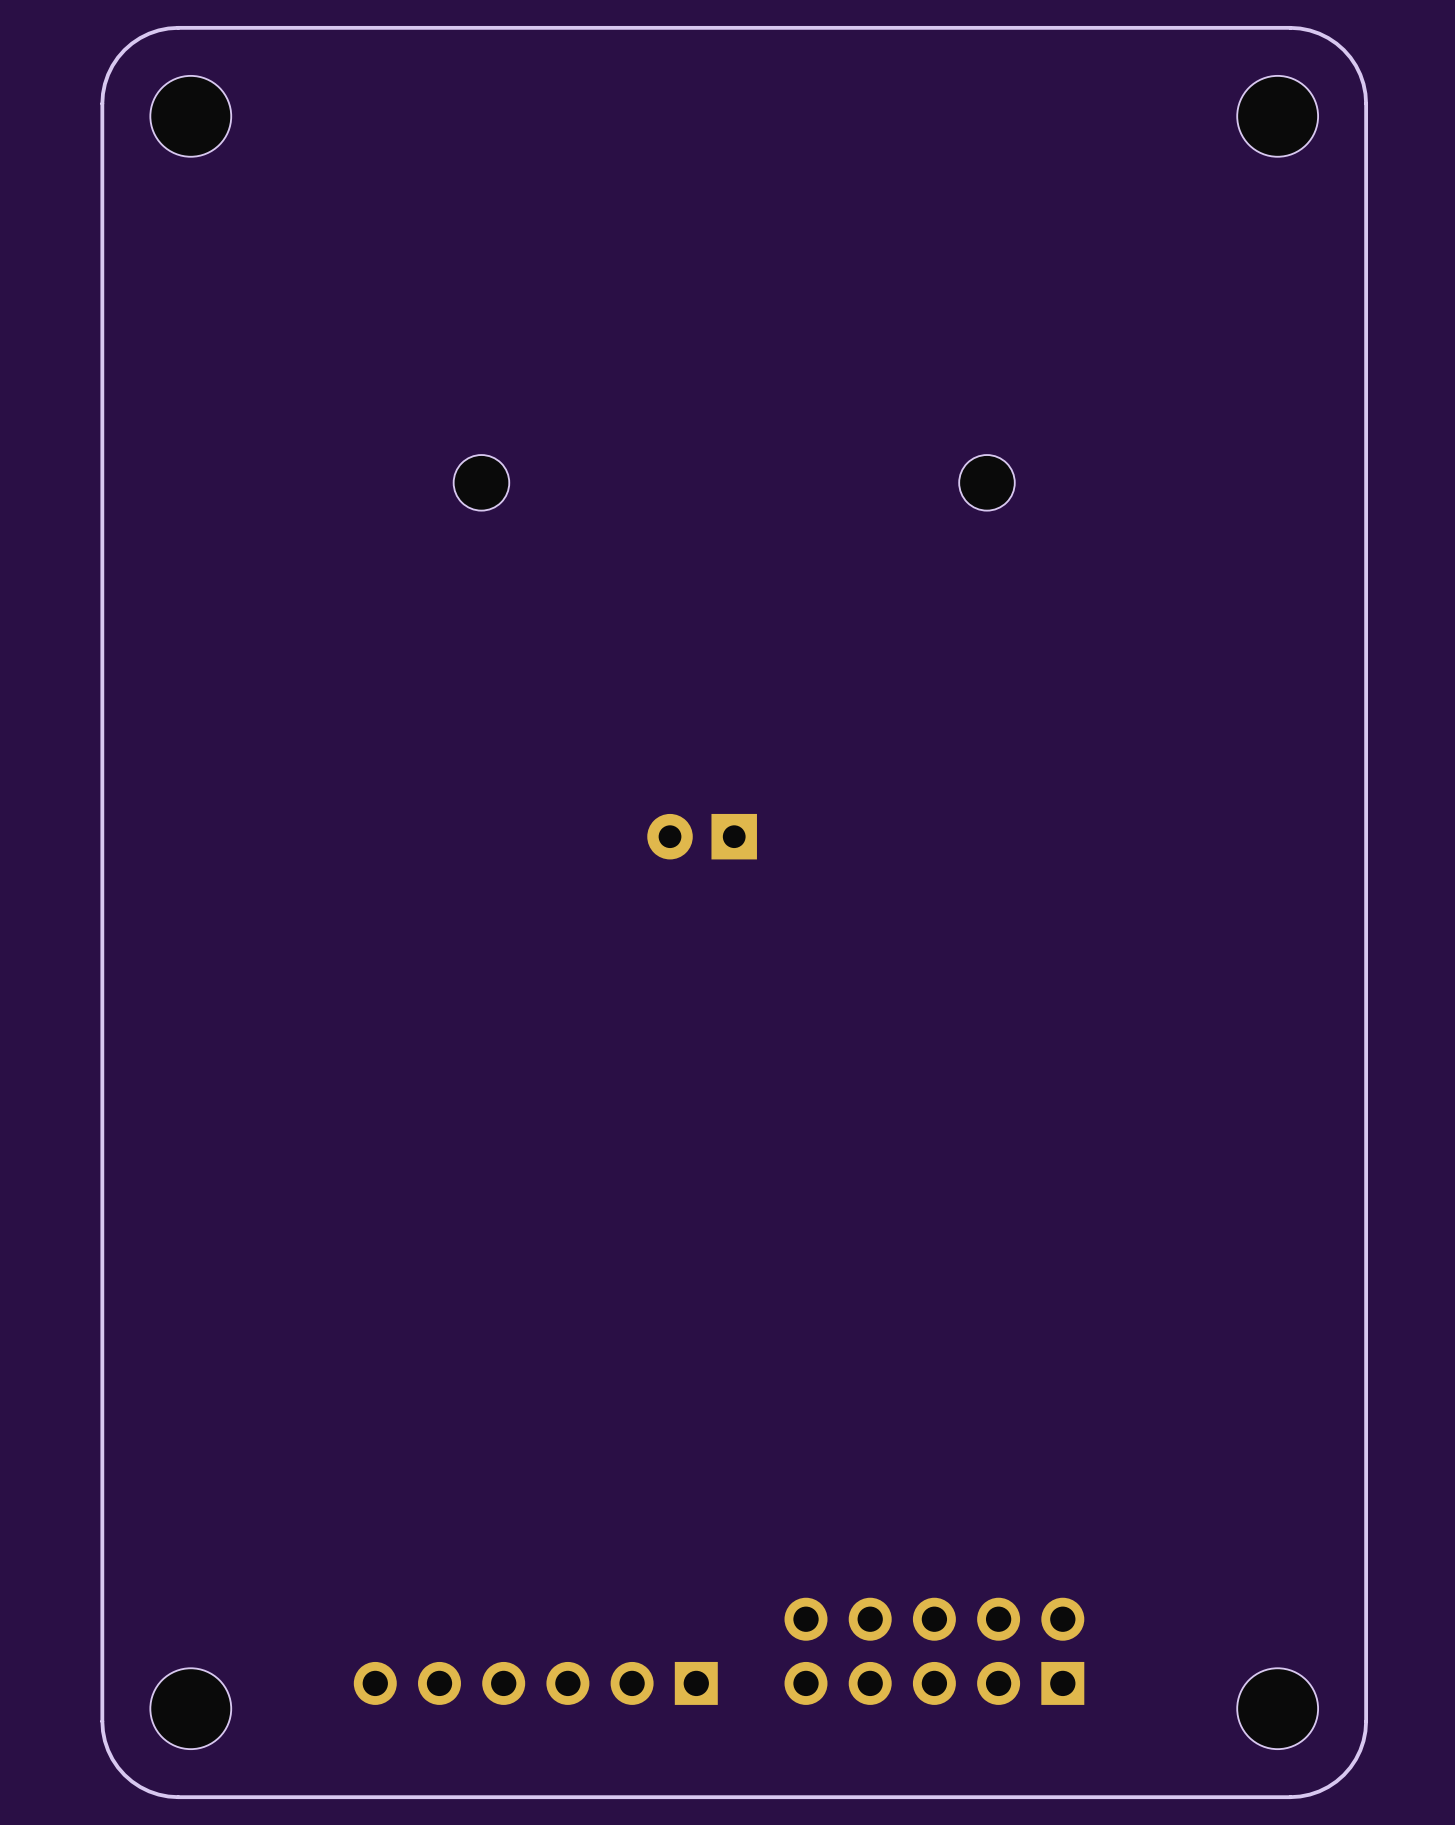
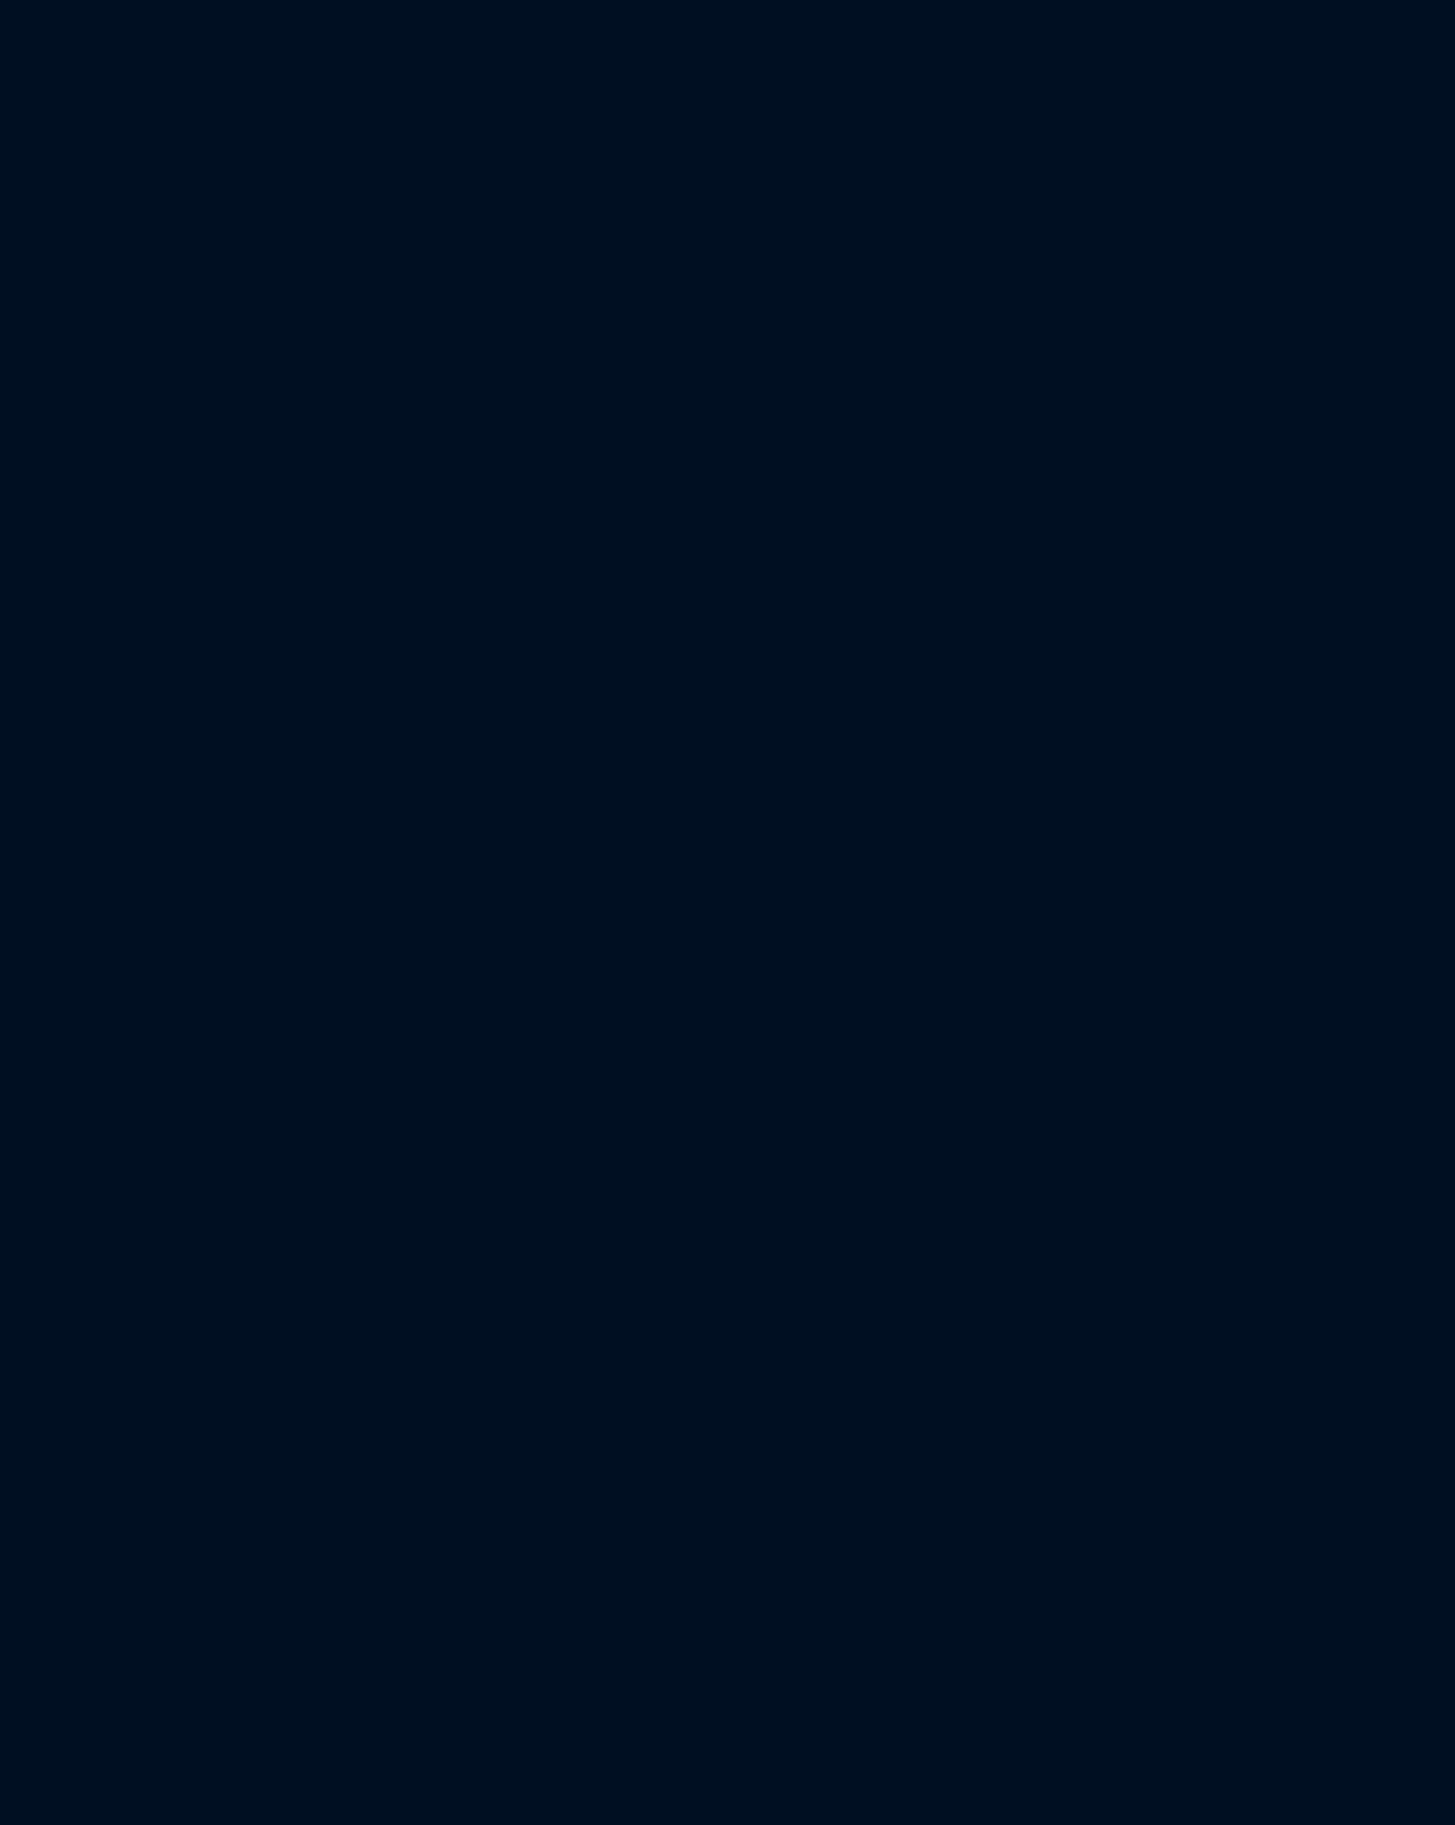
board edge: (1290, 27) (178, 27) (158, 30) (140, 38) (124, 50) (112, 65) (104, 84) (102, 103) (102, 1721) (104, 1740) (112, 1759) (124, 1774) (140, 1787) (158, 1794) (178, 1797) (1290, 1797) (1309, 1794) (1328, 1787) (1343, 1774) (1355, 1759) (1363, 1740) (1366, 1721) (1366, 103) (1360, 74) (1343, 50) (1319, 33) (1290, 27) -> none
part: (190, 116) -> none
part: (1277, 116) -> none
part: (481, 482) -> none
part: (986, 482) -> none
part: (702, 836) -> none
part: (934, 1651) -> none
part: (535, 1683) -> none
part: (190, 1708) -> none
part: (1277, 1708) -> none

